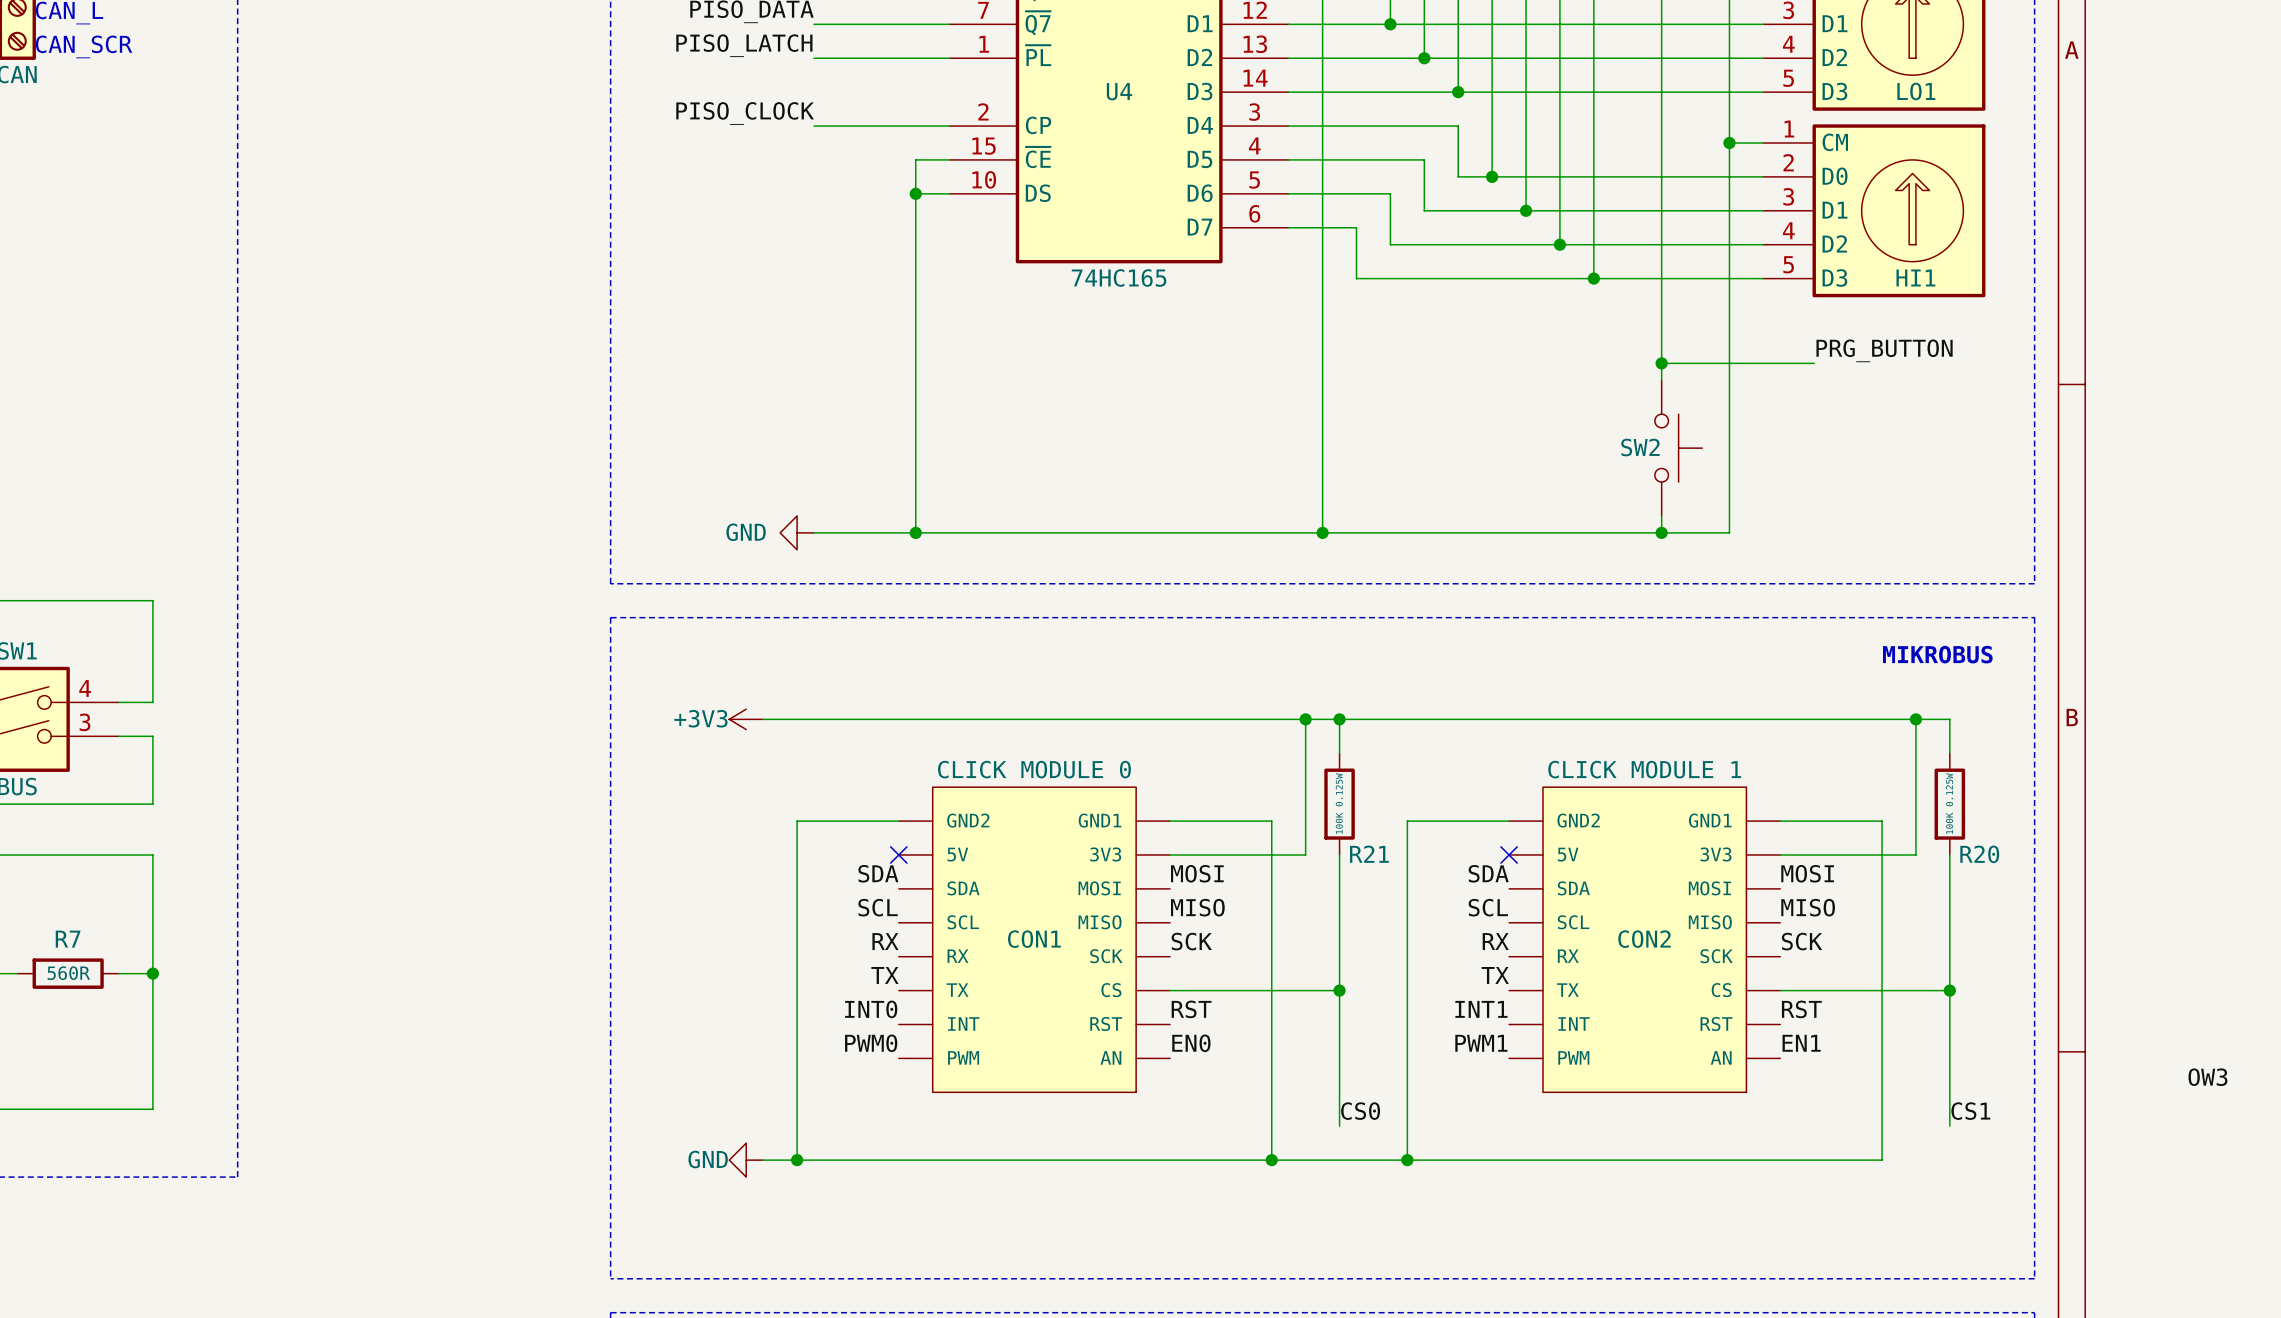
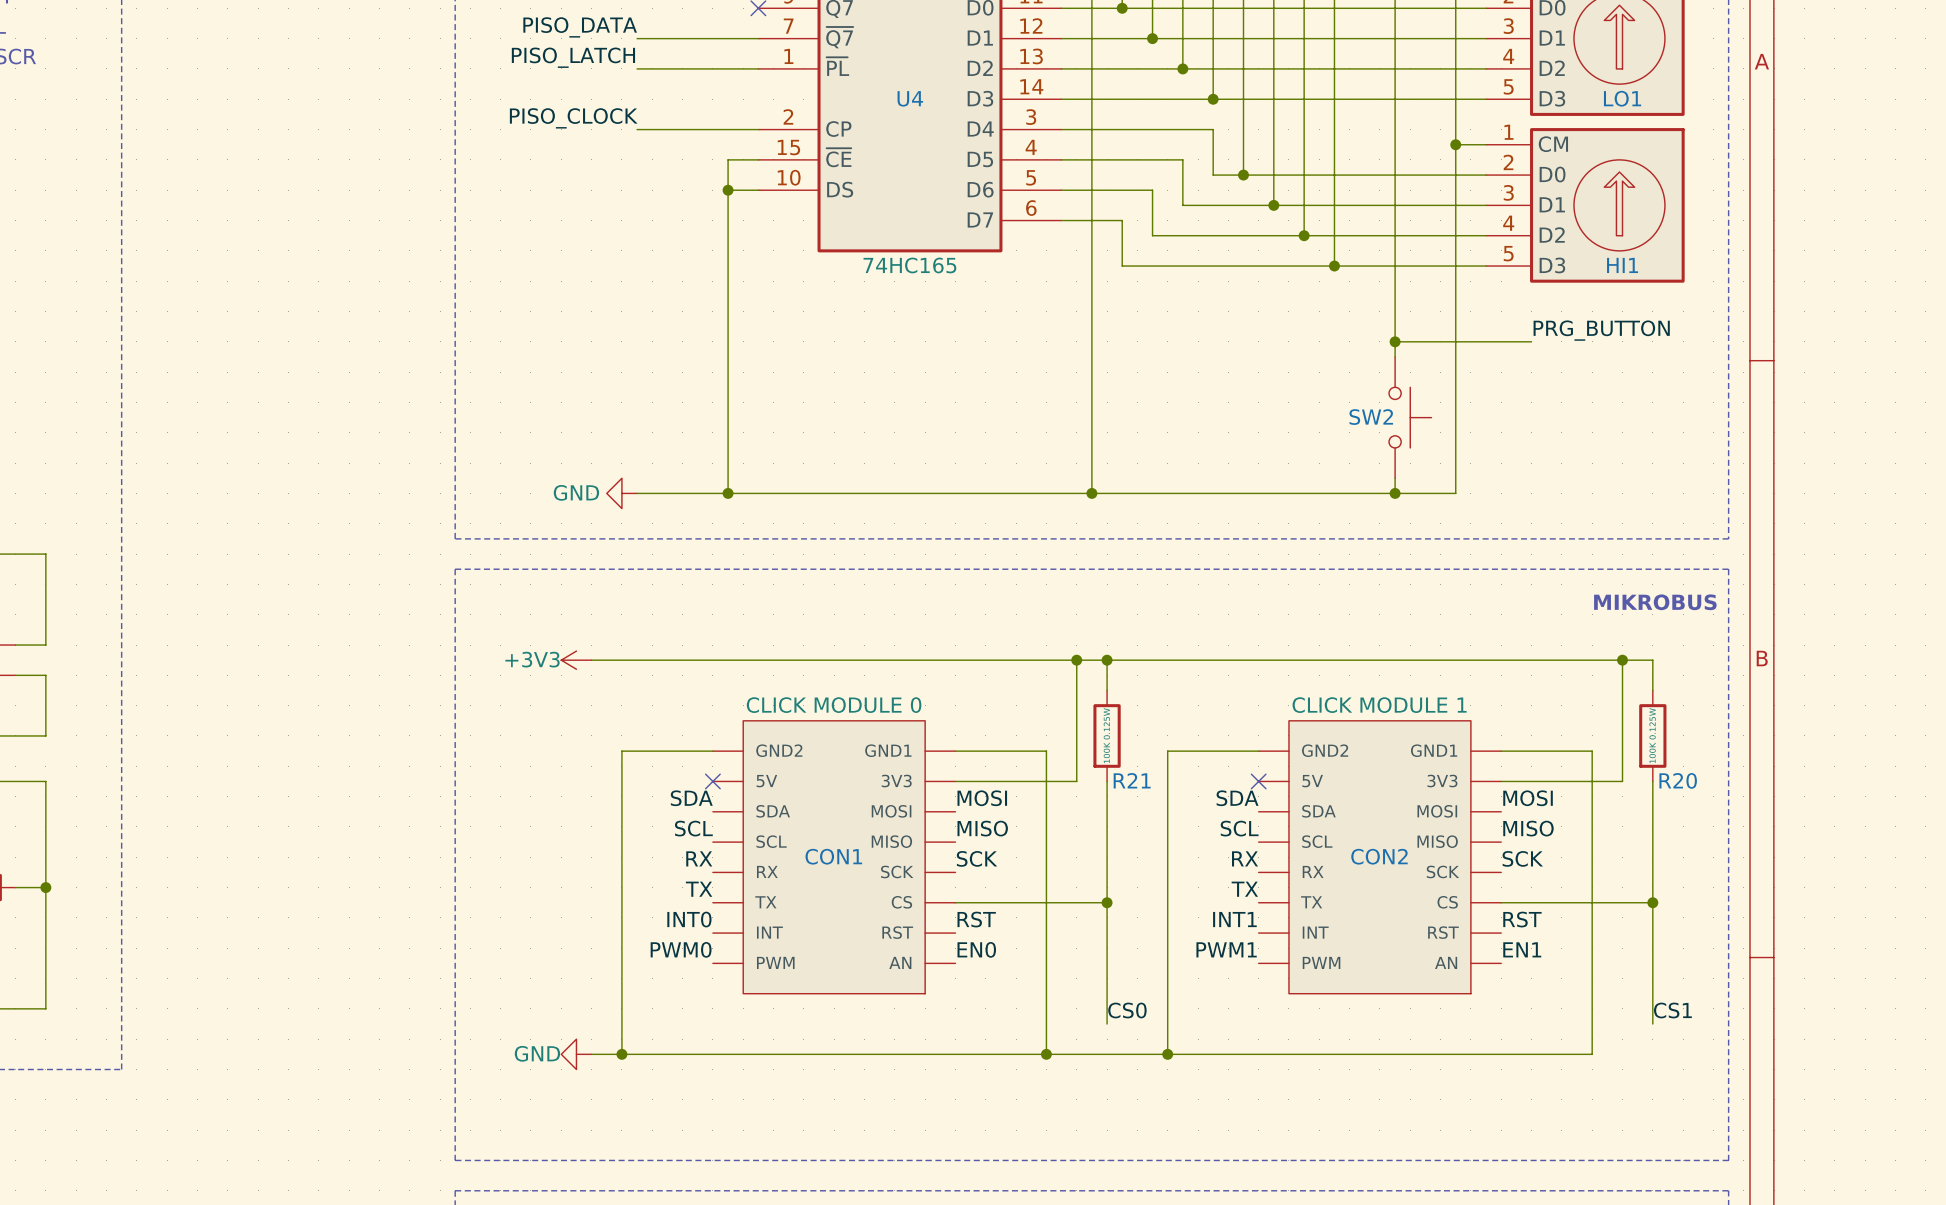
label: OW3 (2207, 1077) -> none

